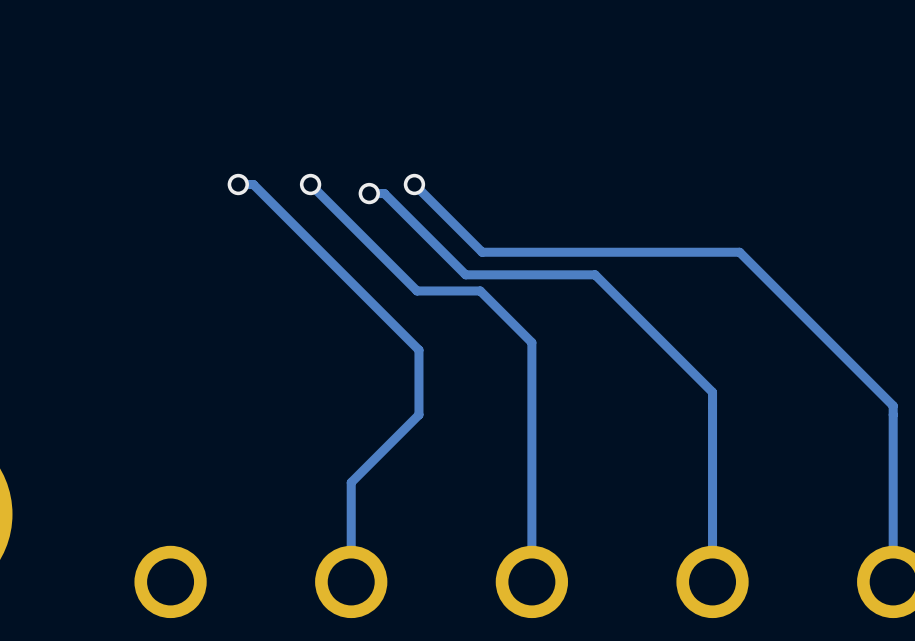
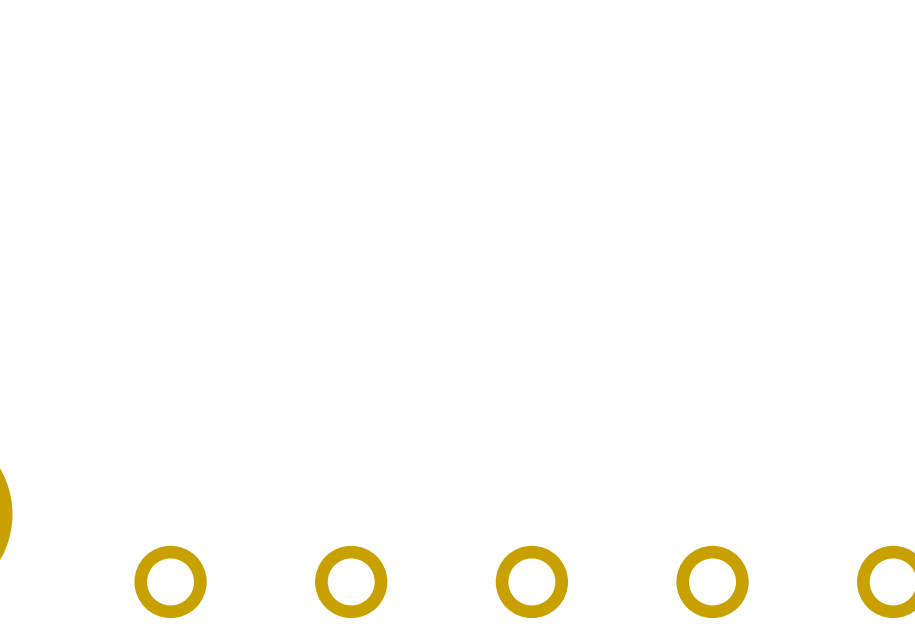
track: (238, 184) (253, 184) (418, 350) (418, 414) (351, 482) (351, 581) -> none
via: (238, 184) -> none
track: (310, 184) (417, 290) (480, 290) (531, 342) (531, 581) -> none
via: (310, 184) -> none
track: (414, 184) (482, 252) (739, 252) (893, 405) (893, 581) -> none
via: (414, 184) -> none
track: (369, 193) (384, 193) (465, 274) (595, 274) (712, 392) (712, 581) -> none
via: (369, 193) -> none

